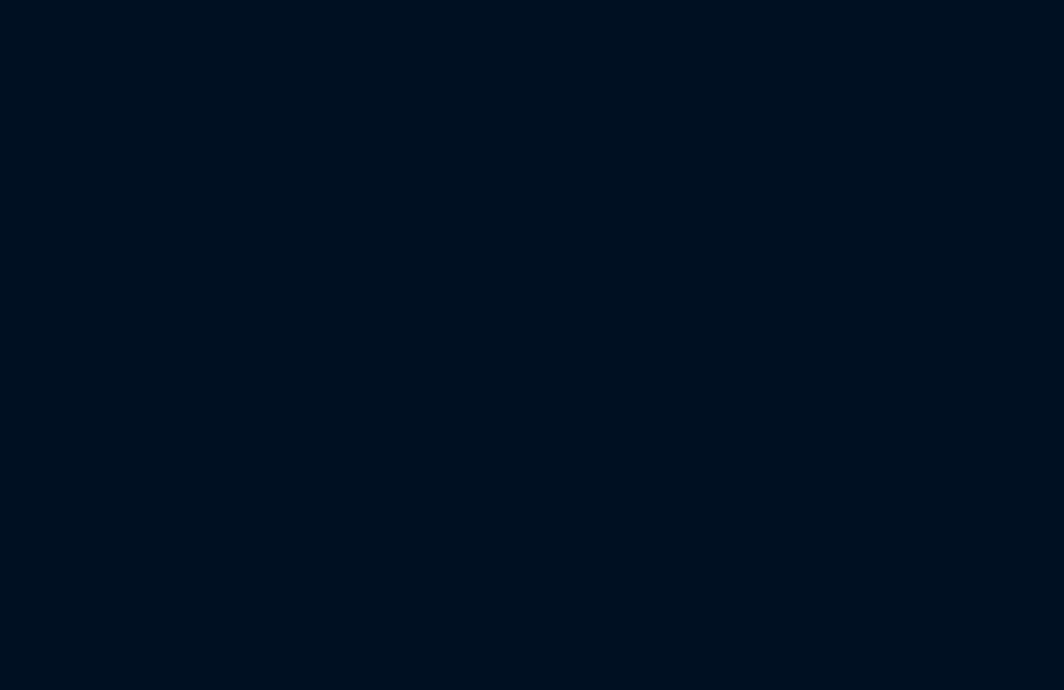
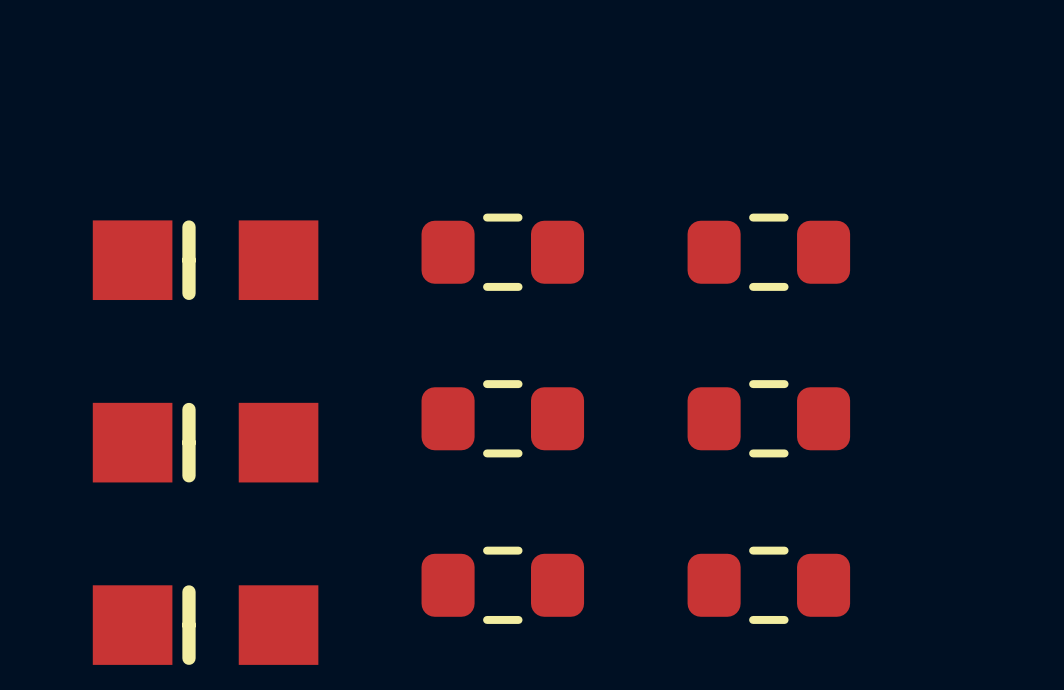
part: none -> (502, 252)
part: none -> (768, 252)
part: none -> (205, 260)
part: none -> (502, 418)
part: none -> (768, 418)
part: none -> (205, 442)
part: none -> (502, 585)
part: none -> (768, 585)
part: none -> (205, 625)

